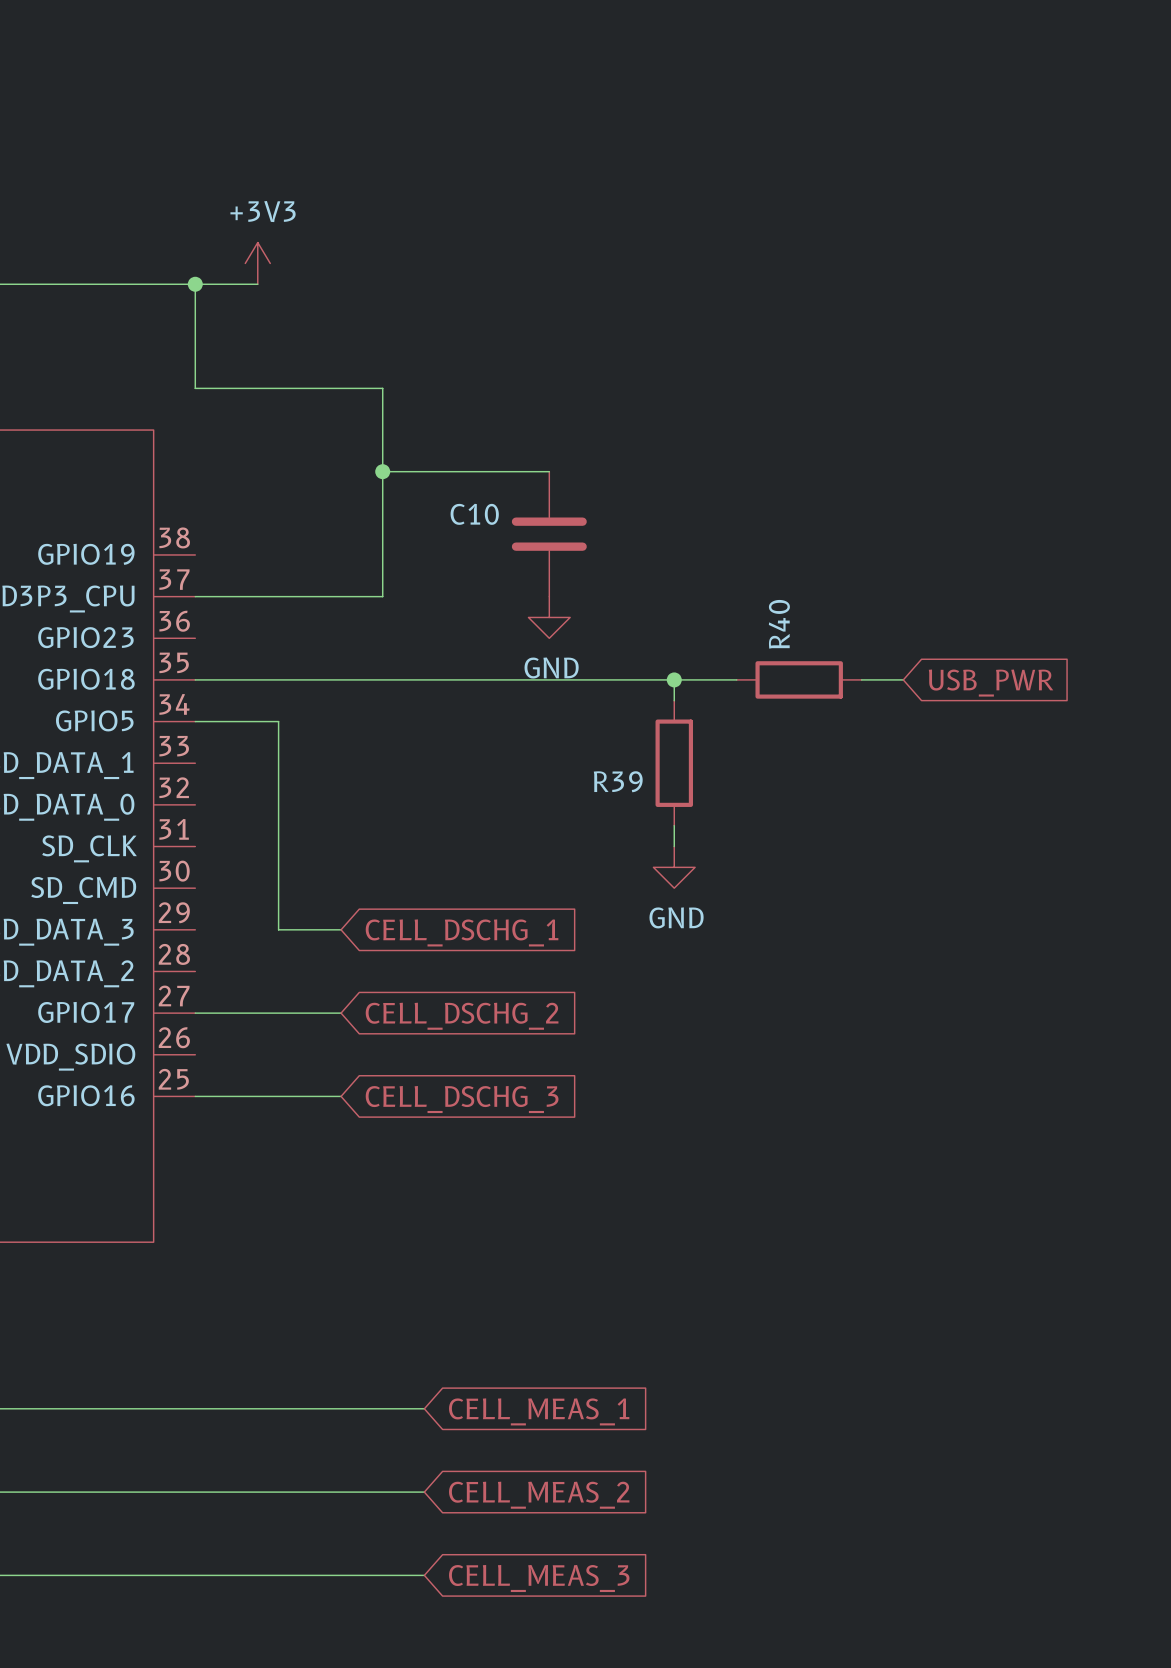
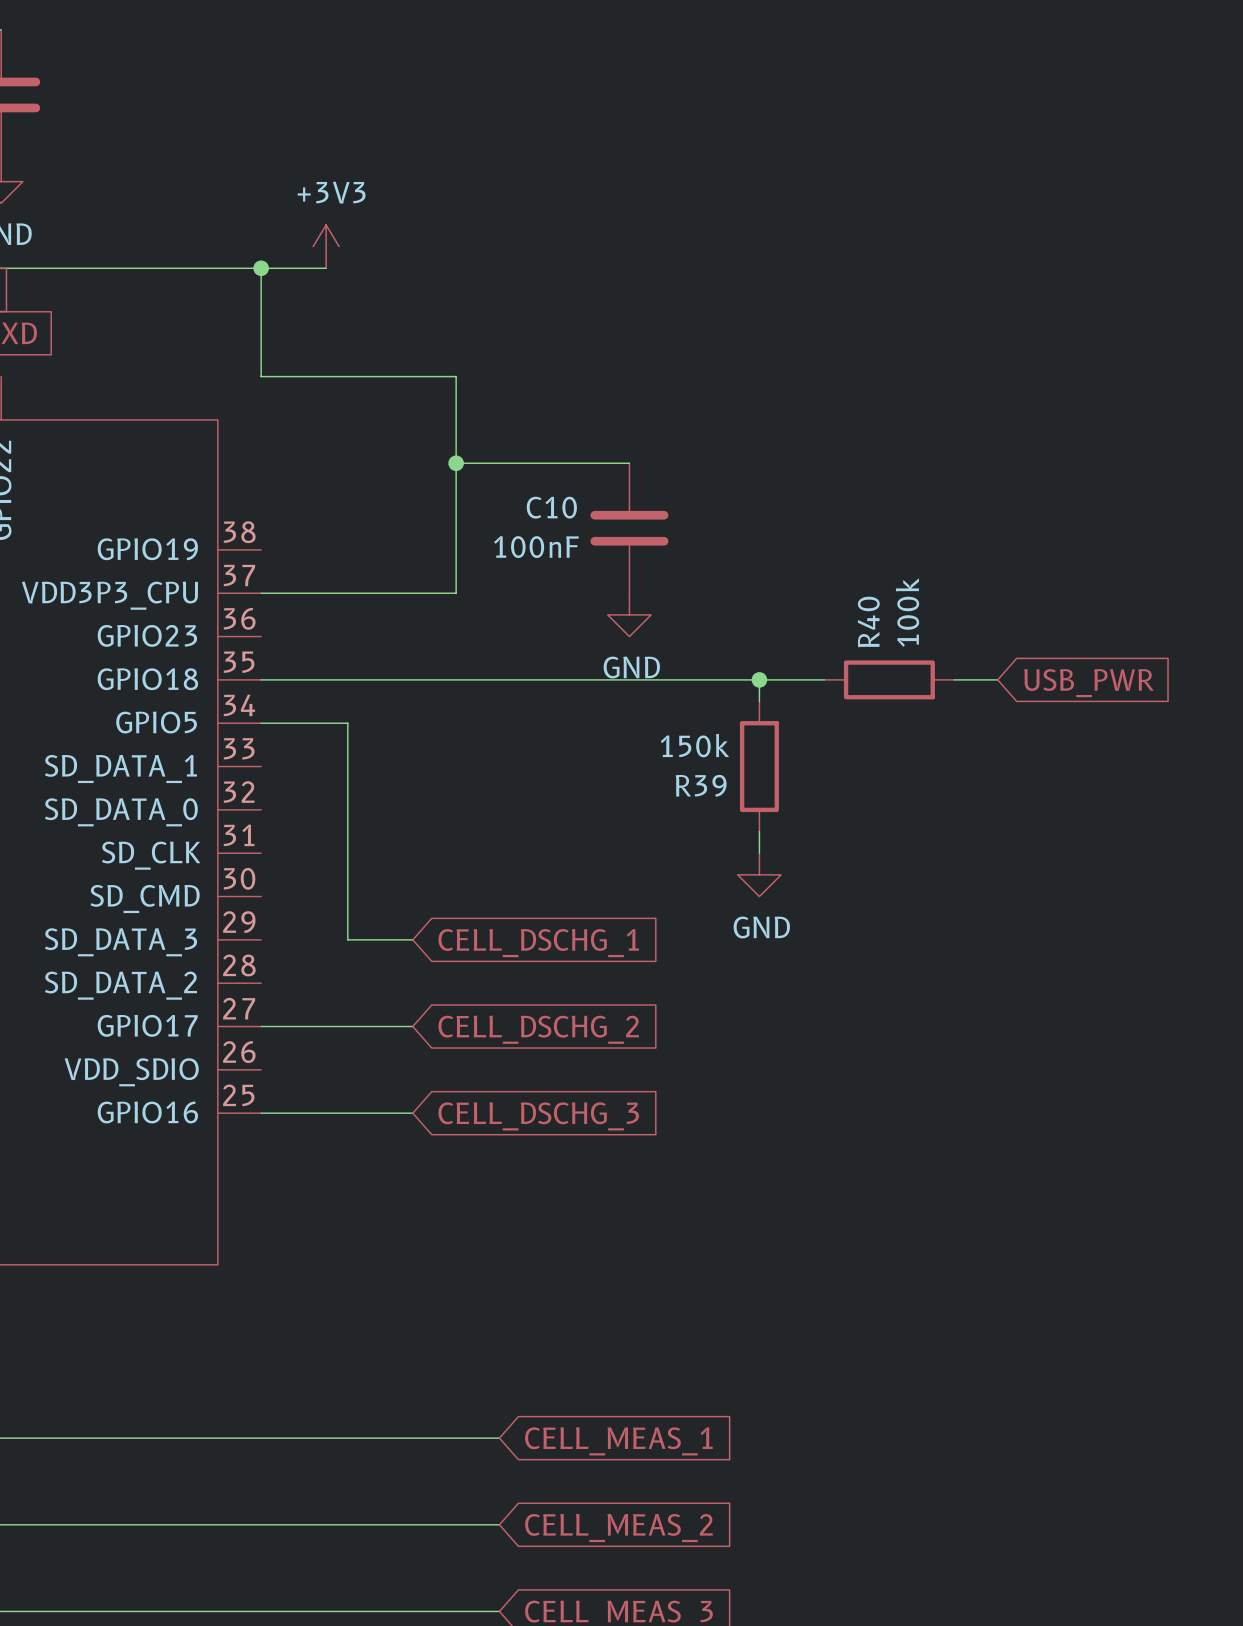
C10 value: none -> 100nF (536, 547)
R40 value: none -> 100k (907, 612)
R39 value: none -> 150k (694, 745)

